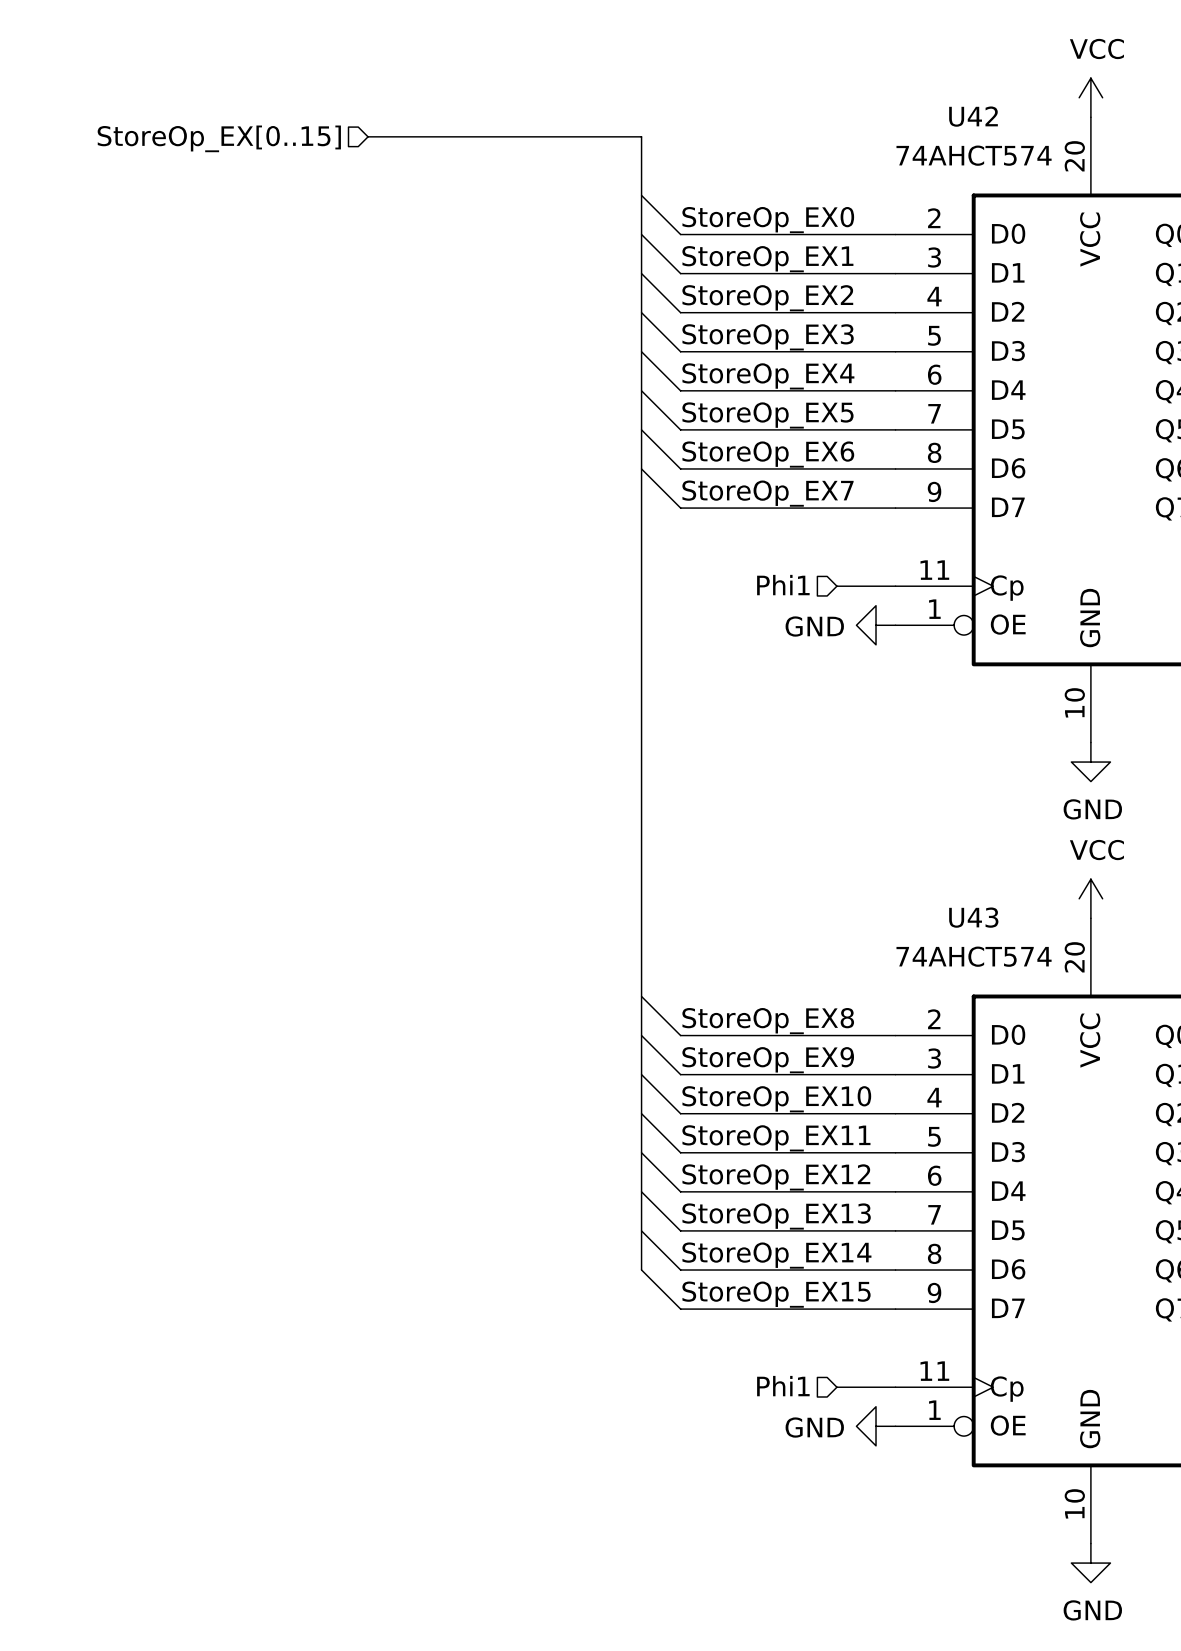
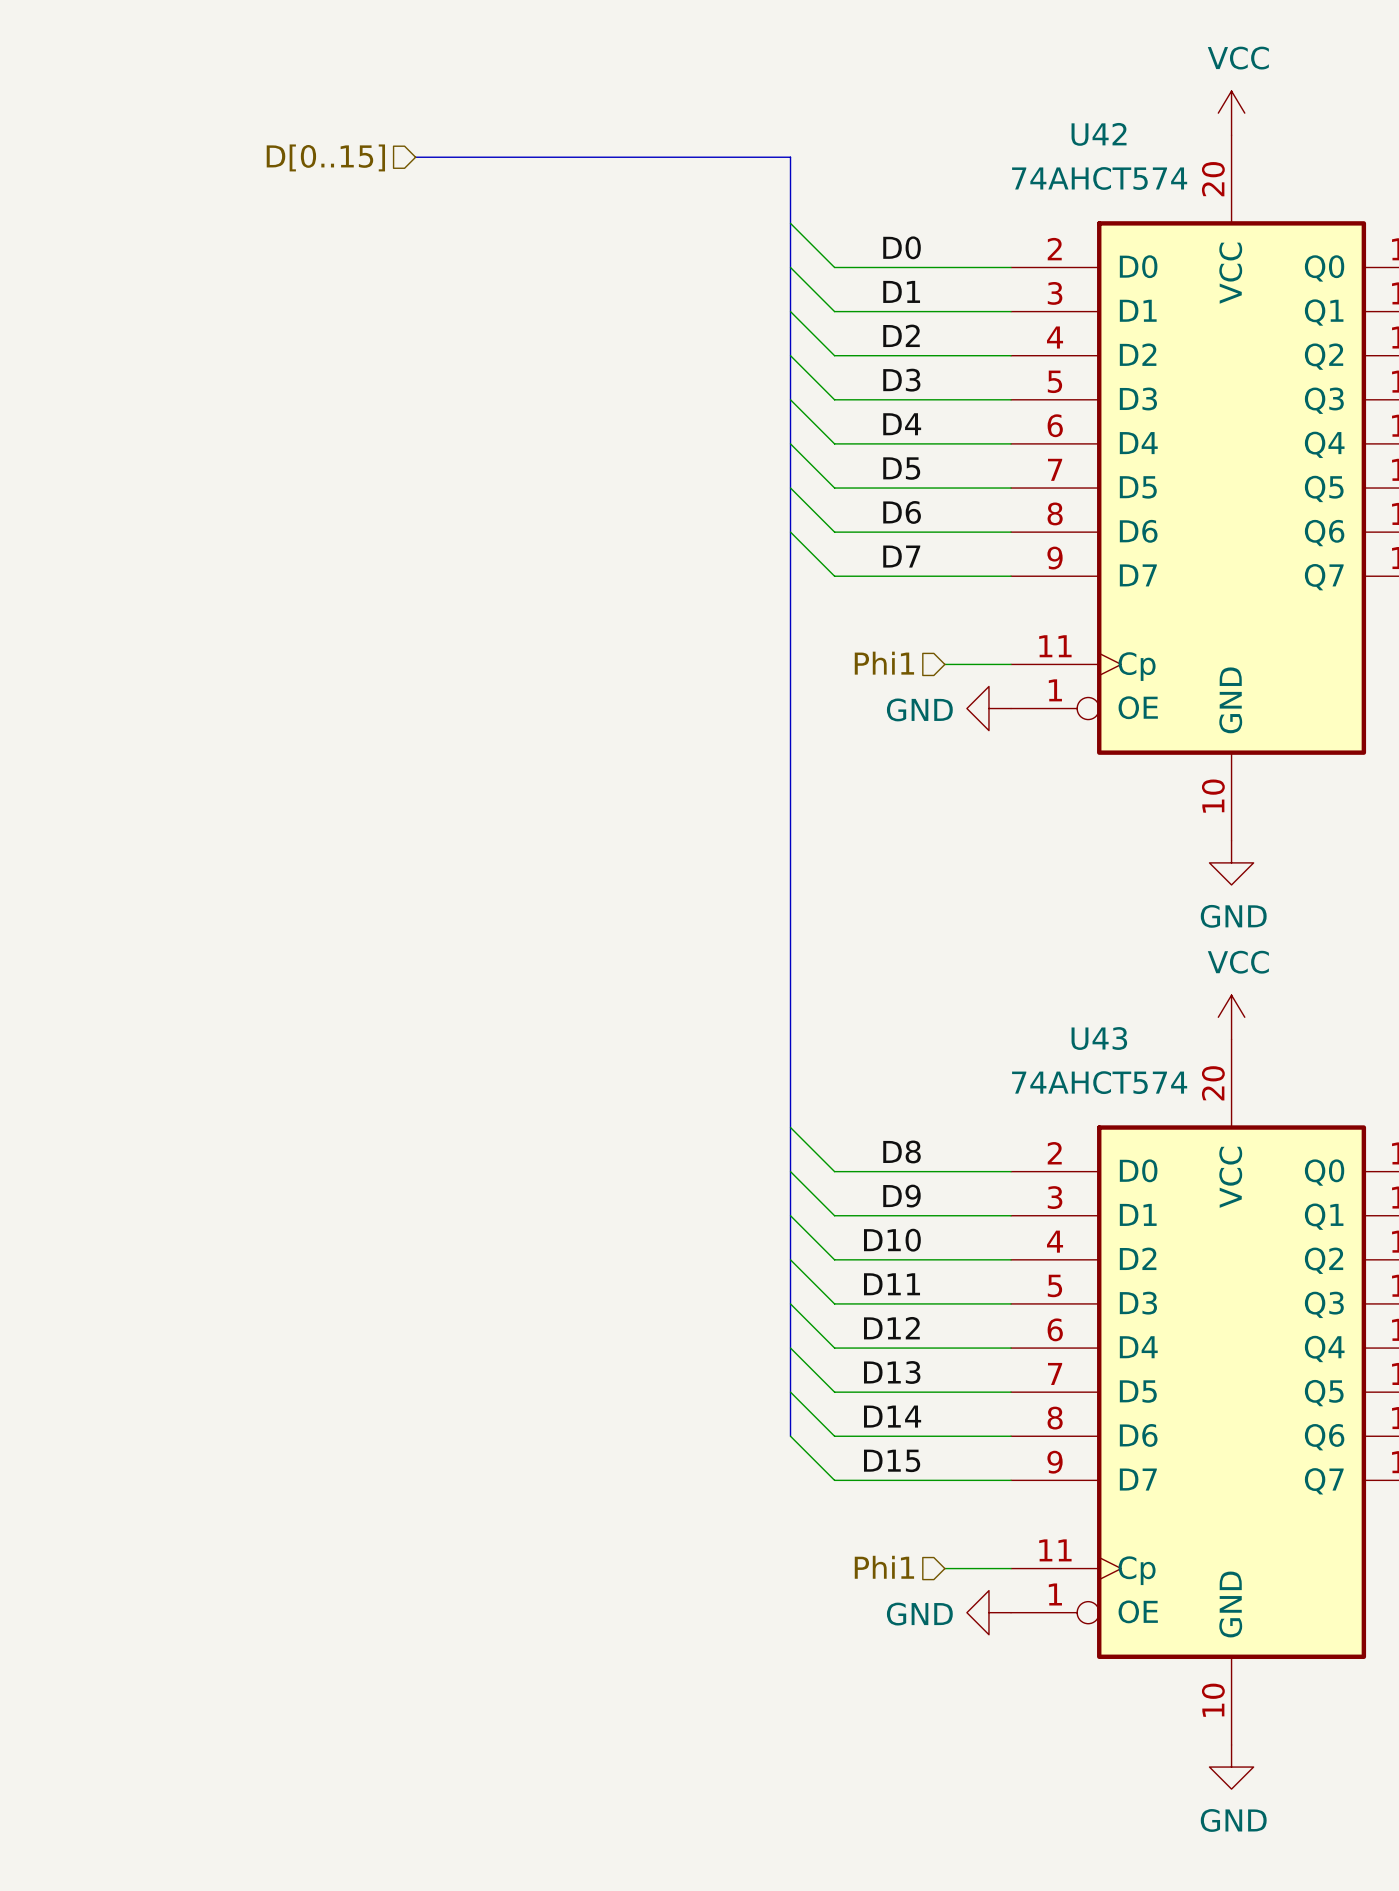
bus: (641, 136) (641, 1270) -> (724, 157) (790, 157) (790, 1436)
hierarchical label: StoreOp_EX[0..15] (219, 138) -> D[0..15] (325, 157)
wire: (641, 195) (680, 234) (739, 234) -> (790, 223) (834, 267)
label: none -> D0 (902, 247)
label: StoreOp_EX0 (768, 220) -> none
wire: (641, 234) (680, 273) (739, 273) -> (790, 267) (834, 311)
label: none -> D1 (901, 291)
label: StoreOp_EX1 (767, 259) -> none
wire: (641, 273) (680, 312) (739, 312) -> (790, 311) (834, 355)
label: none -> D2 (901, 335)
label: StoreOp_EX2 (767, 298) -> none
wire: (641, 312) (680, 351) (739, 351) -> (790, 355) (834, 399)
label: none -> D3 (901, 380)
label: StoreOp_EX3 (768, 337) -> none
wire: (641, 351) (680, 390) (739, 390) -> (790, 399) (834, 443)
label: none -> D4 (902, 424)
label: StoreOp_EX4 (768, 376) -> none
wire: (641, 390) (680, 429) (739, 429) -> (790, 443) (834, 488)
label: none -> D5 (901, 468)
label: StoreOp_EX5 (767, 415) -> none
wire: (641, 429) (680, 468) (739, 468) -> (790, 488) (834, 532)
label: none -> D6 (902, 512)
label: StoreOp_EX6 (768, 454) -> none
wire: (641, 468) (680, 508) (739, 508) -> (790, 532) (834, 576)
label: none -> D7 (901, 556)
label: StoreOp_EX7 (768, 493) -> none
wire: (641, 996) (680, 1035) (739, 1035) -> (790, 1127) (834, 1171)
label: none -> D8 (902, 1151)
label: StoreOp_EX8 (768, 1021) -> none
wire: (641, 1035) (680, 1074) (739, 1074) -> (790, 1171) (834, 1215)
label: none -> D9 (901, 1196)
label: StoreOp_EX9 (768, 1060) -> none
wire: (641, 1074) (680, 1113) (739, 1113) -> (790, 1215) (834, 1259)
label: none -> D10 (892, 1240)
label: StoreOp_EX10 (776, 1099) -> none
wire: (641, 1113) (680, 1152) (739, 1152) -> (790, 1259) (834, 1303)
label: none -> D11 (892, 1284)
label: StoreOp_EX11 (776, 1138) -> none
wire: (641, 1152) (680, 1191) (739, 1191) -> (790, 1303) (834, 1348)
label: none -> D12 (891, 1328)
label: StoreOp_EX12 (776, 1177) -> none
wire: (641, 1191) (680, 1230) (739, 1230) -> (790, 1348) (834, 1392)
label: none -> D13 (892, 1372)
label: StoreOp_EX13 (776, 1216) -> none
wire: (641, 1230) (680, 1270) (739, 1270) -> (790, 1392) (834, 1436)
label: none -> D14 (892, 1416)
label: StoreOp_EX14 (776, 1255) -> none
wire: (641, 1270) (680, 1309) (739, 1309) -> (790, 1436) (834, 1480)
label: none -> D15 (892, 1460)
label: StoreOp_EX15 (776, 1294) -> none

